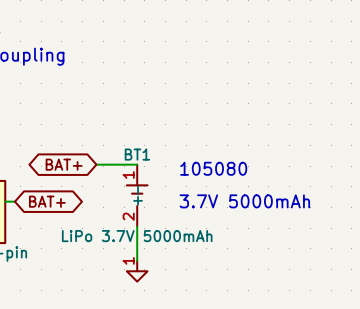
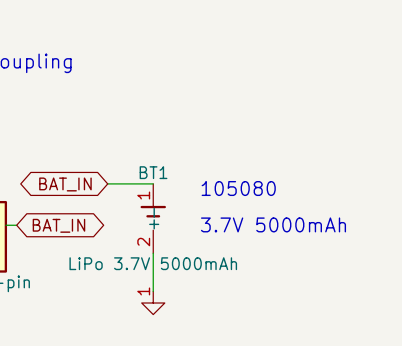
global label: BAT+ (64, 164) -> BAT_IN (65, 184)
global label: BAT+ (47, 201) -> BAT_IN (58, 225)

